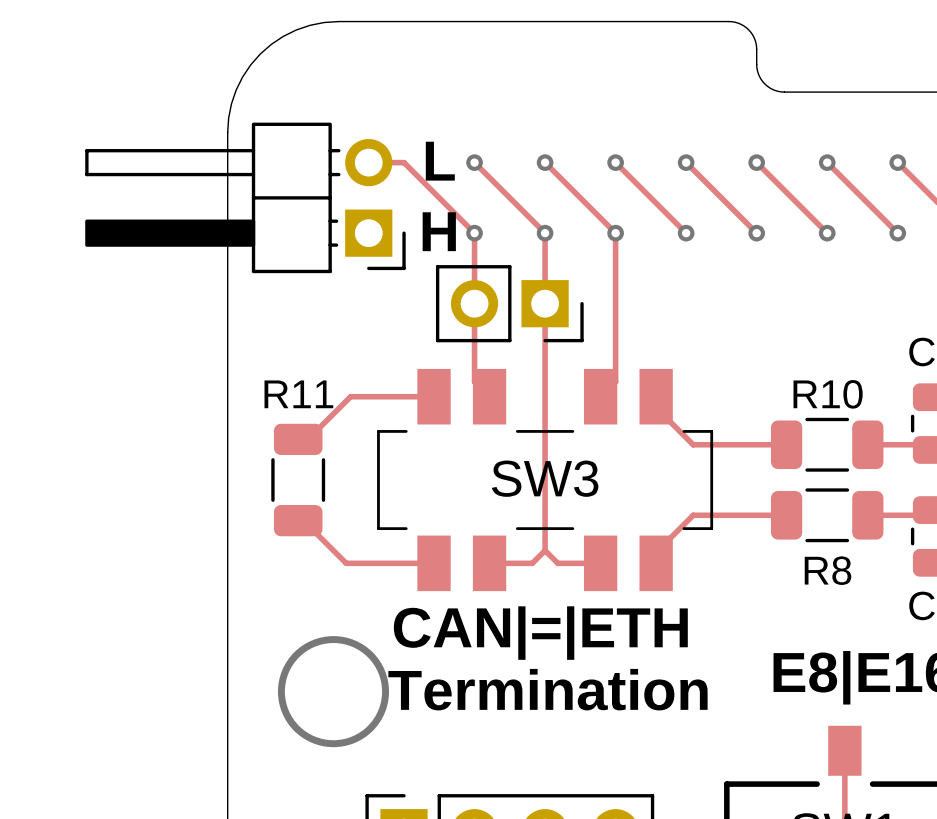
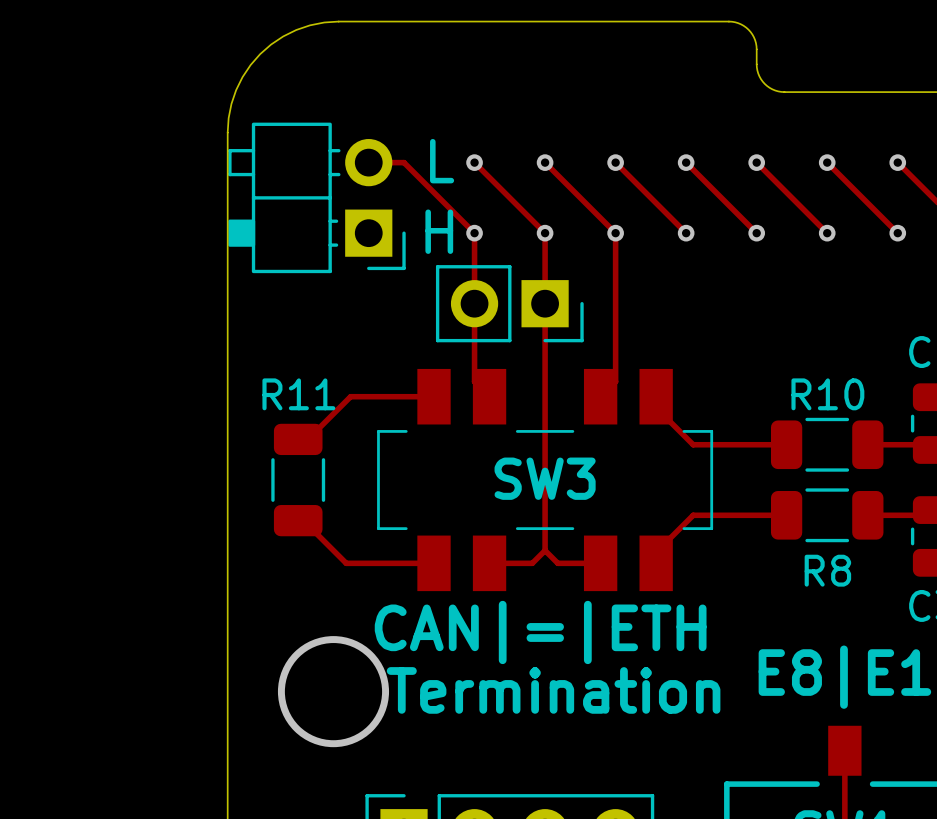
part: (245, 197) -> none
part: none -> (316, 197)

